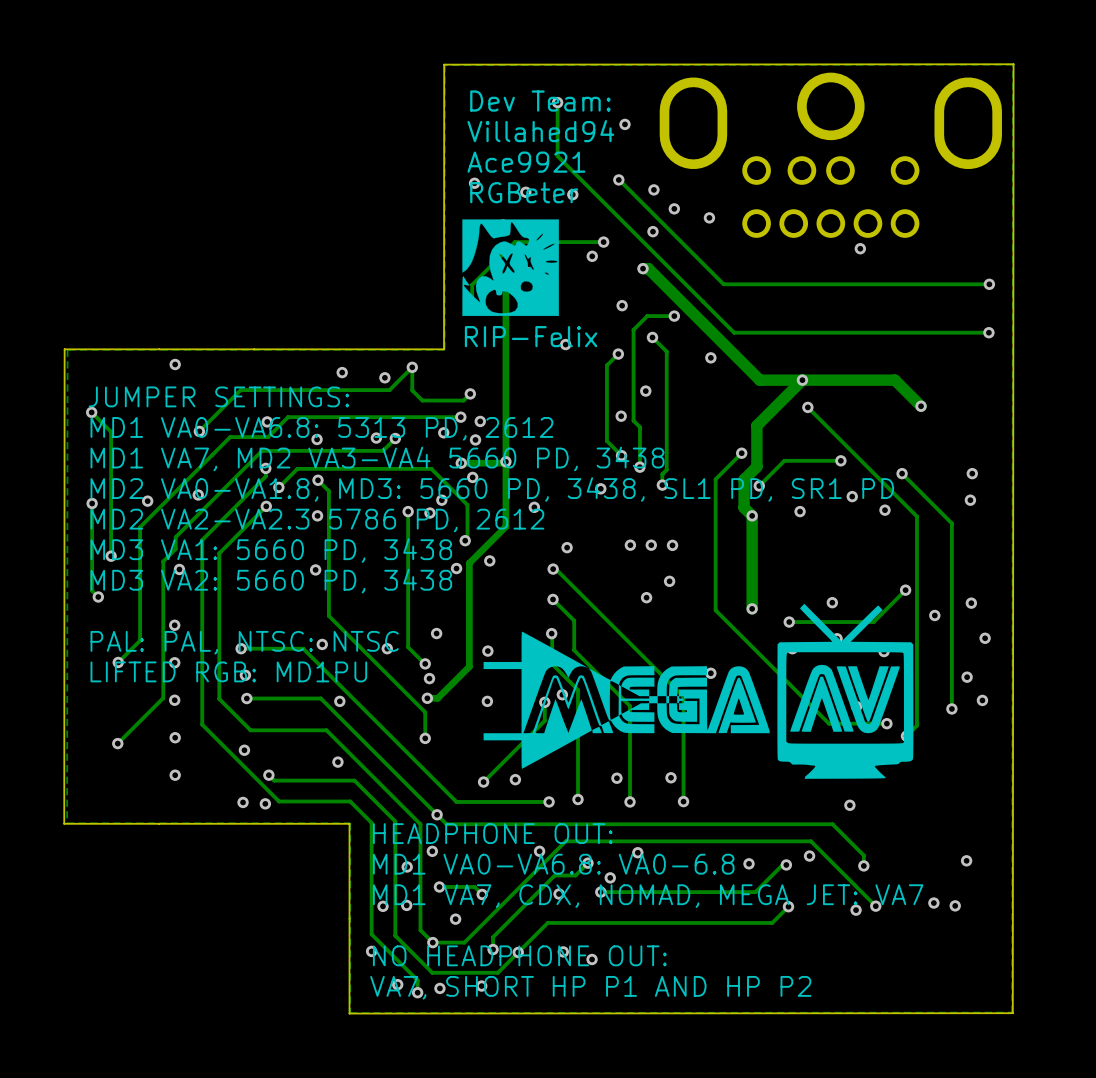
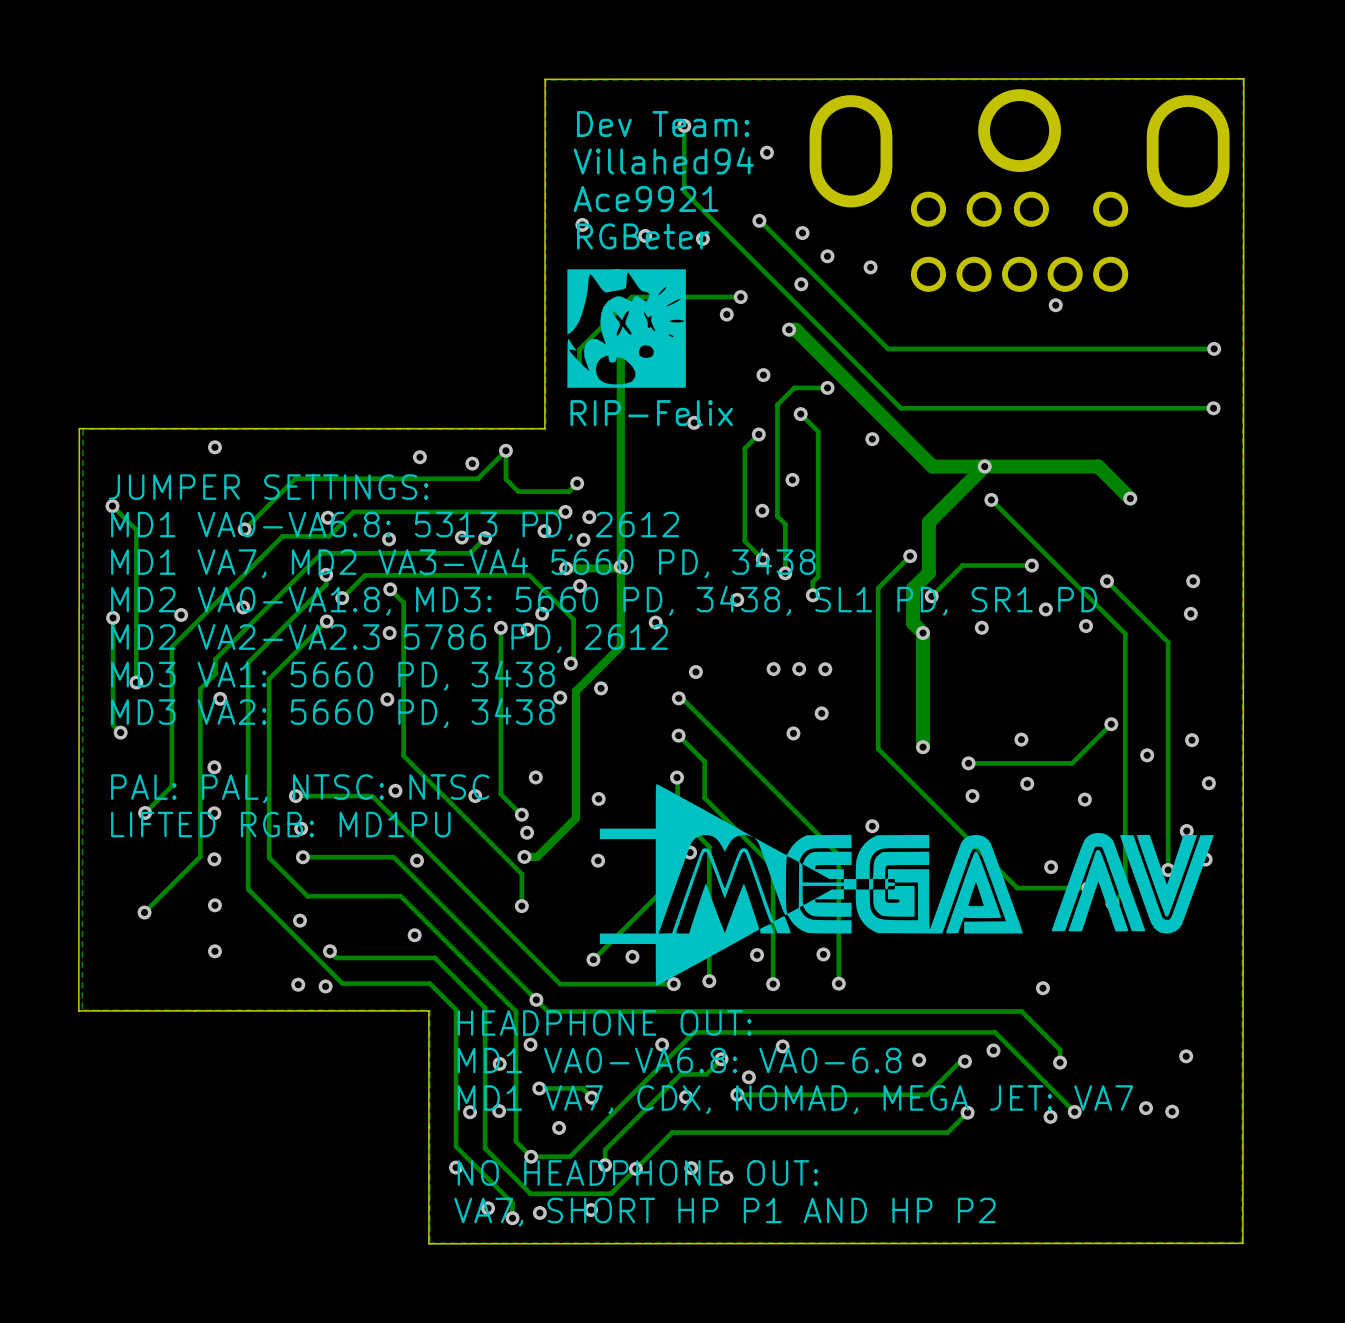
drawing: [483, 603, 914, 779] -> none
drawing: none -> [599, 784, 1214, 986]

